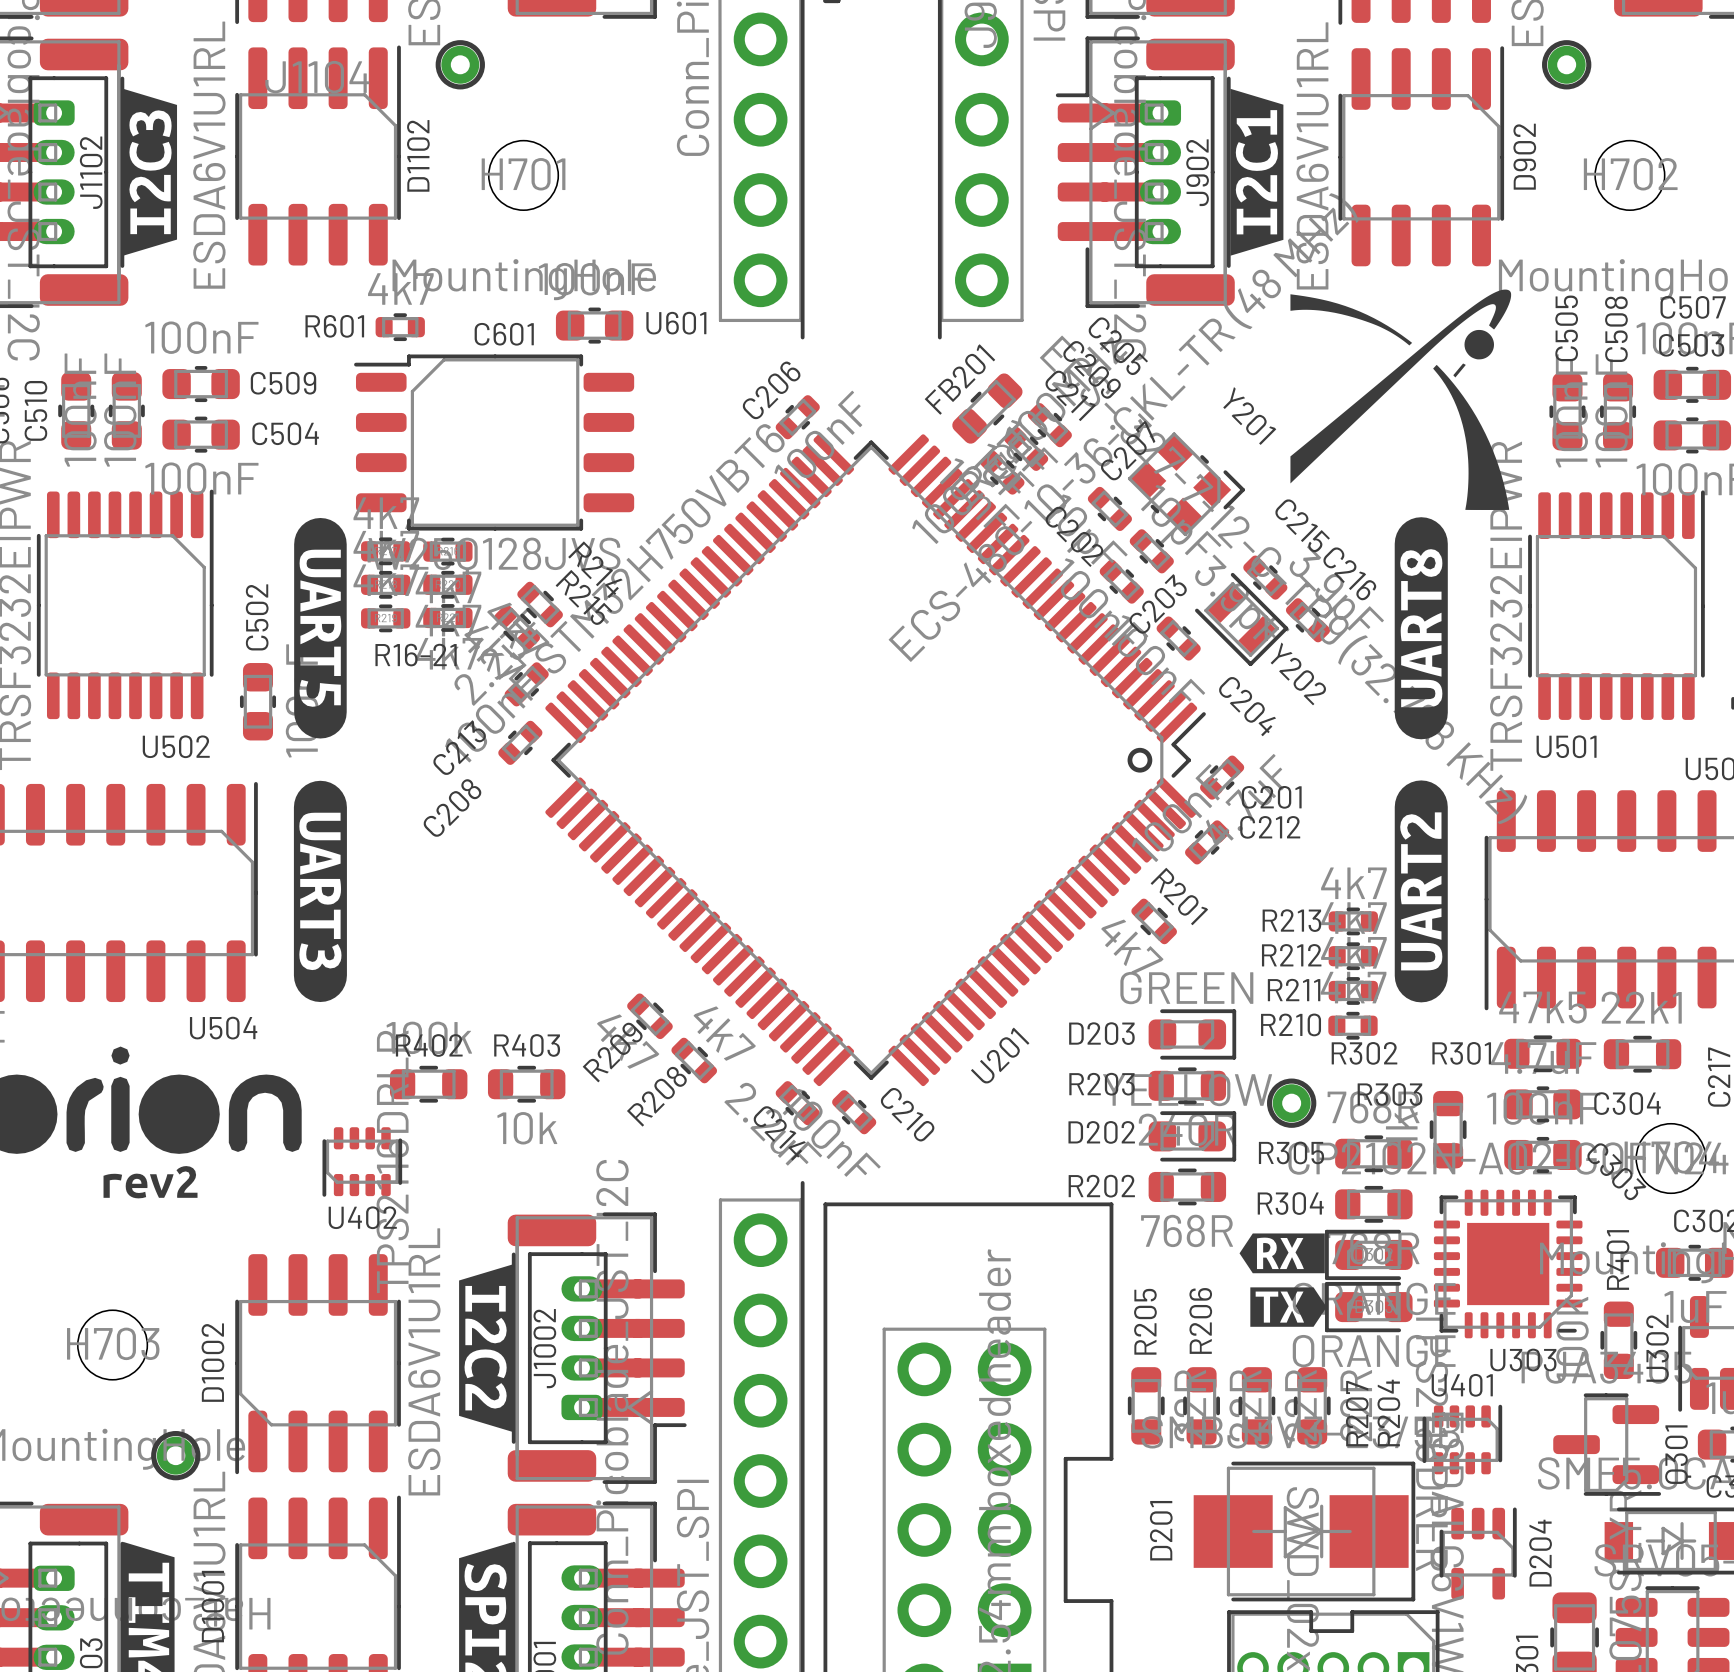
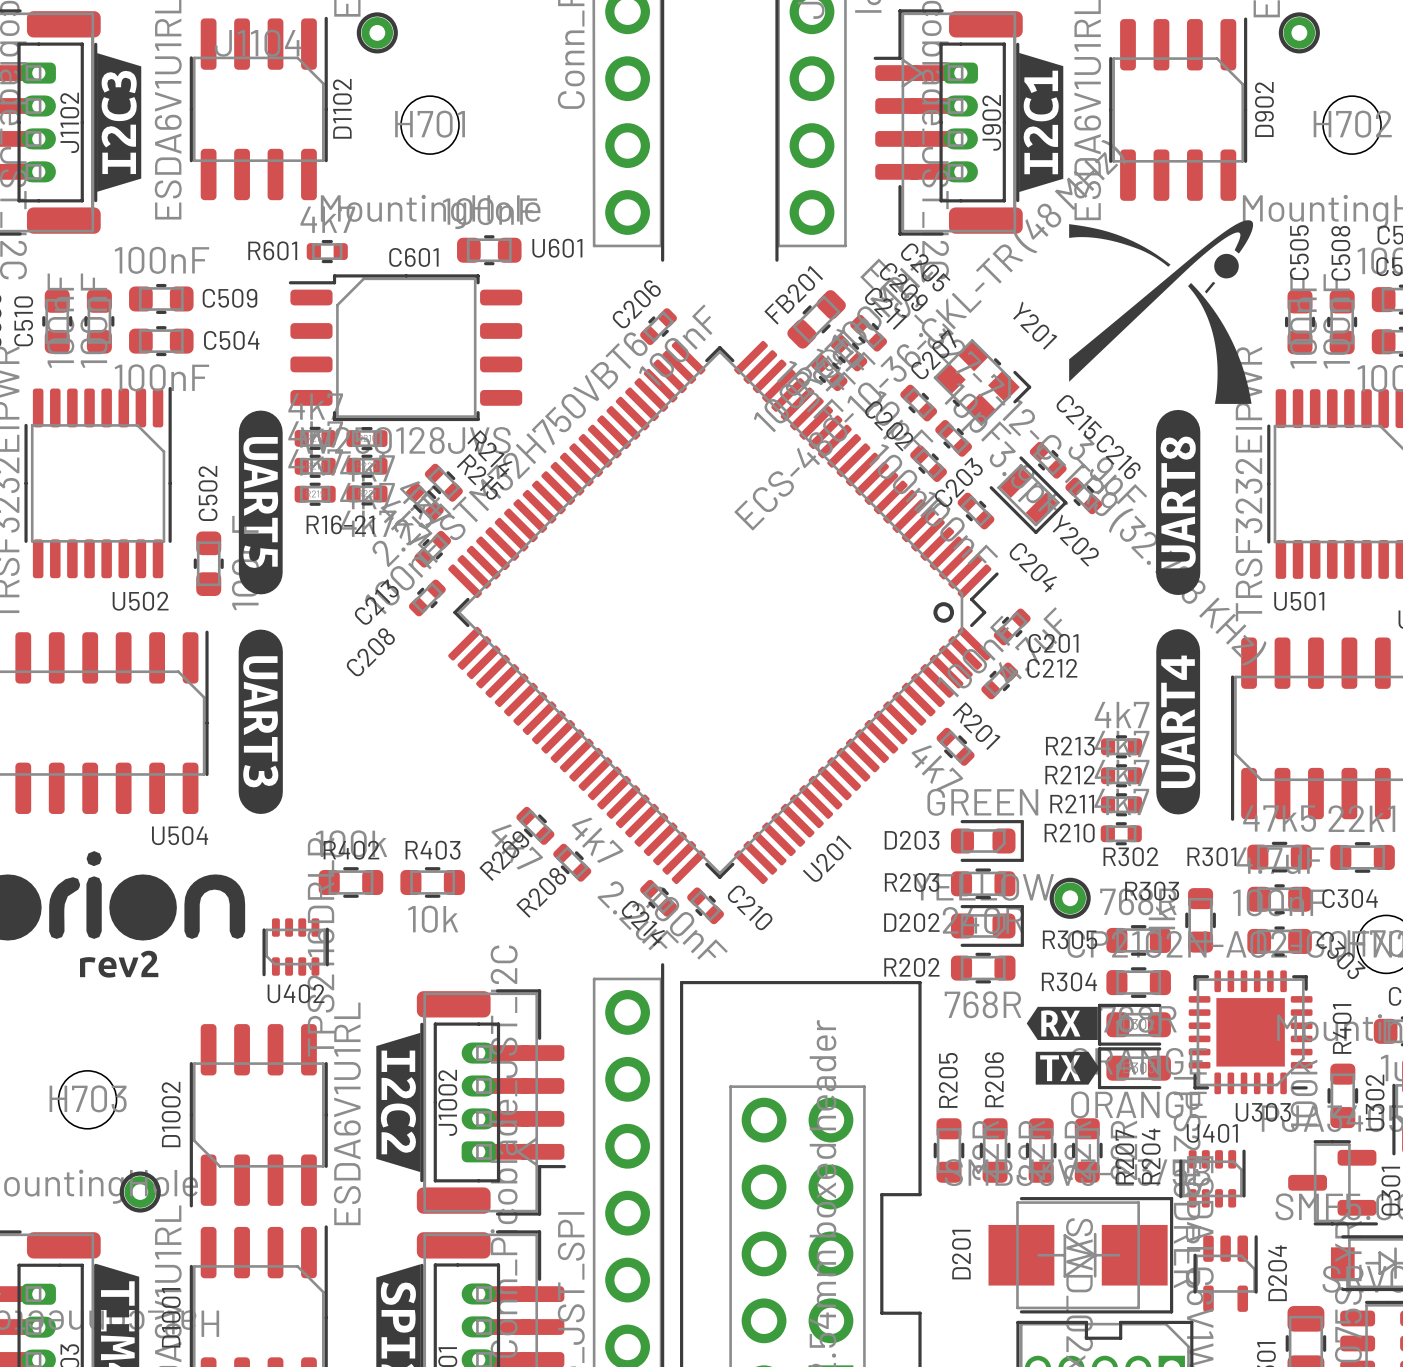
drawing shape: [1394, 780, 1448, 1003] -> [1156, 629, 1201, 815]

